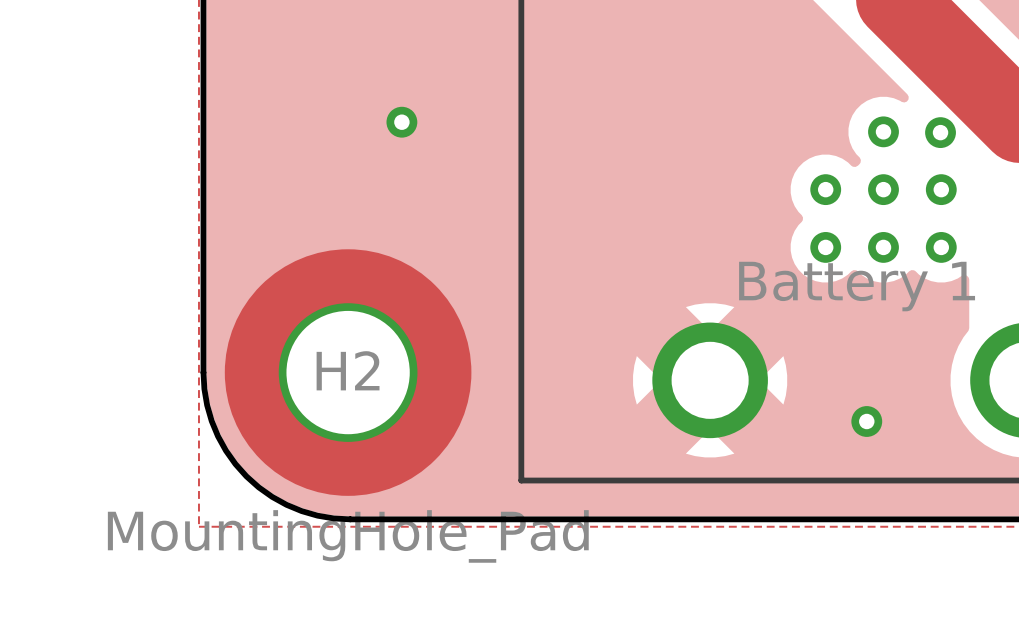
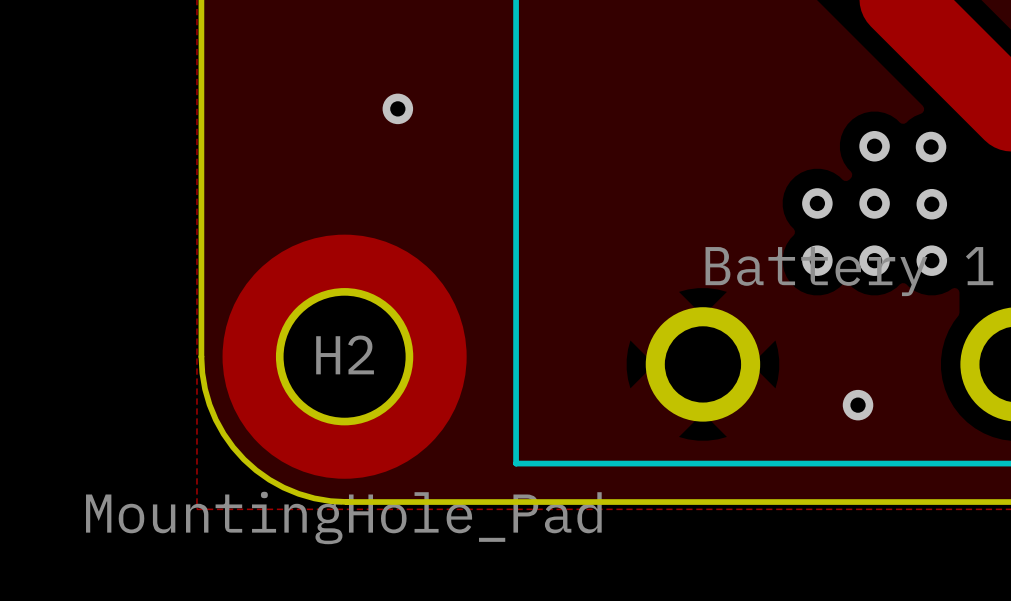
via: (883, 131) -> none
via: (940, 132) -> none
via: none -> (874, 146)
via: none -> (931, 147)
via: (825, 189) -> none
via: (883, 189) -> none
via: (941, 189) -> none
via: none -> (817, 203)
via: none -> (874, 203)
via: none -> (931, 204)
via: (825, 247) -> none
via: (883, 247) -> none
via: (941, 247) -> none
via: none -> (817, 260)
via: none -> (874, 260)
via: none -> (931, 260)

